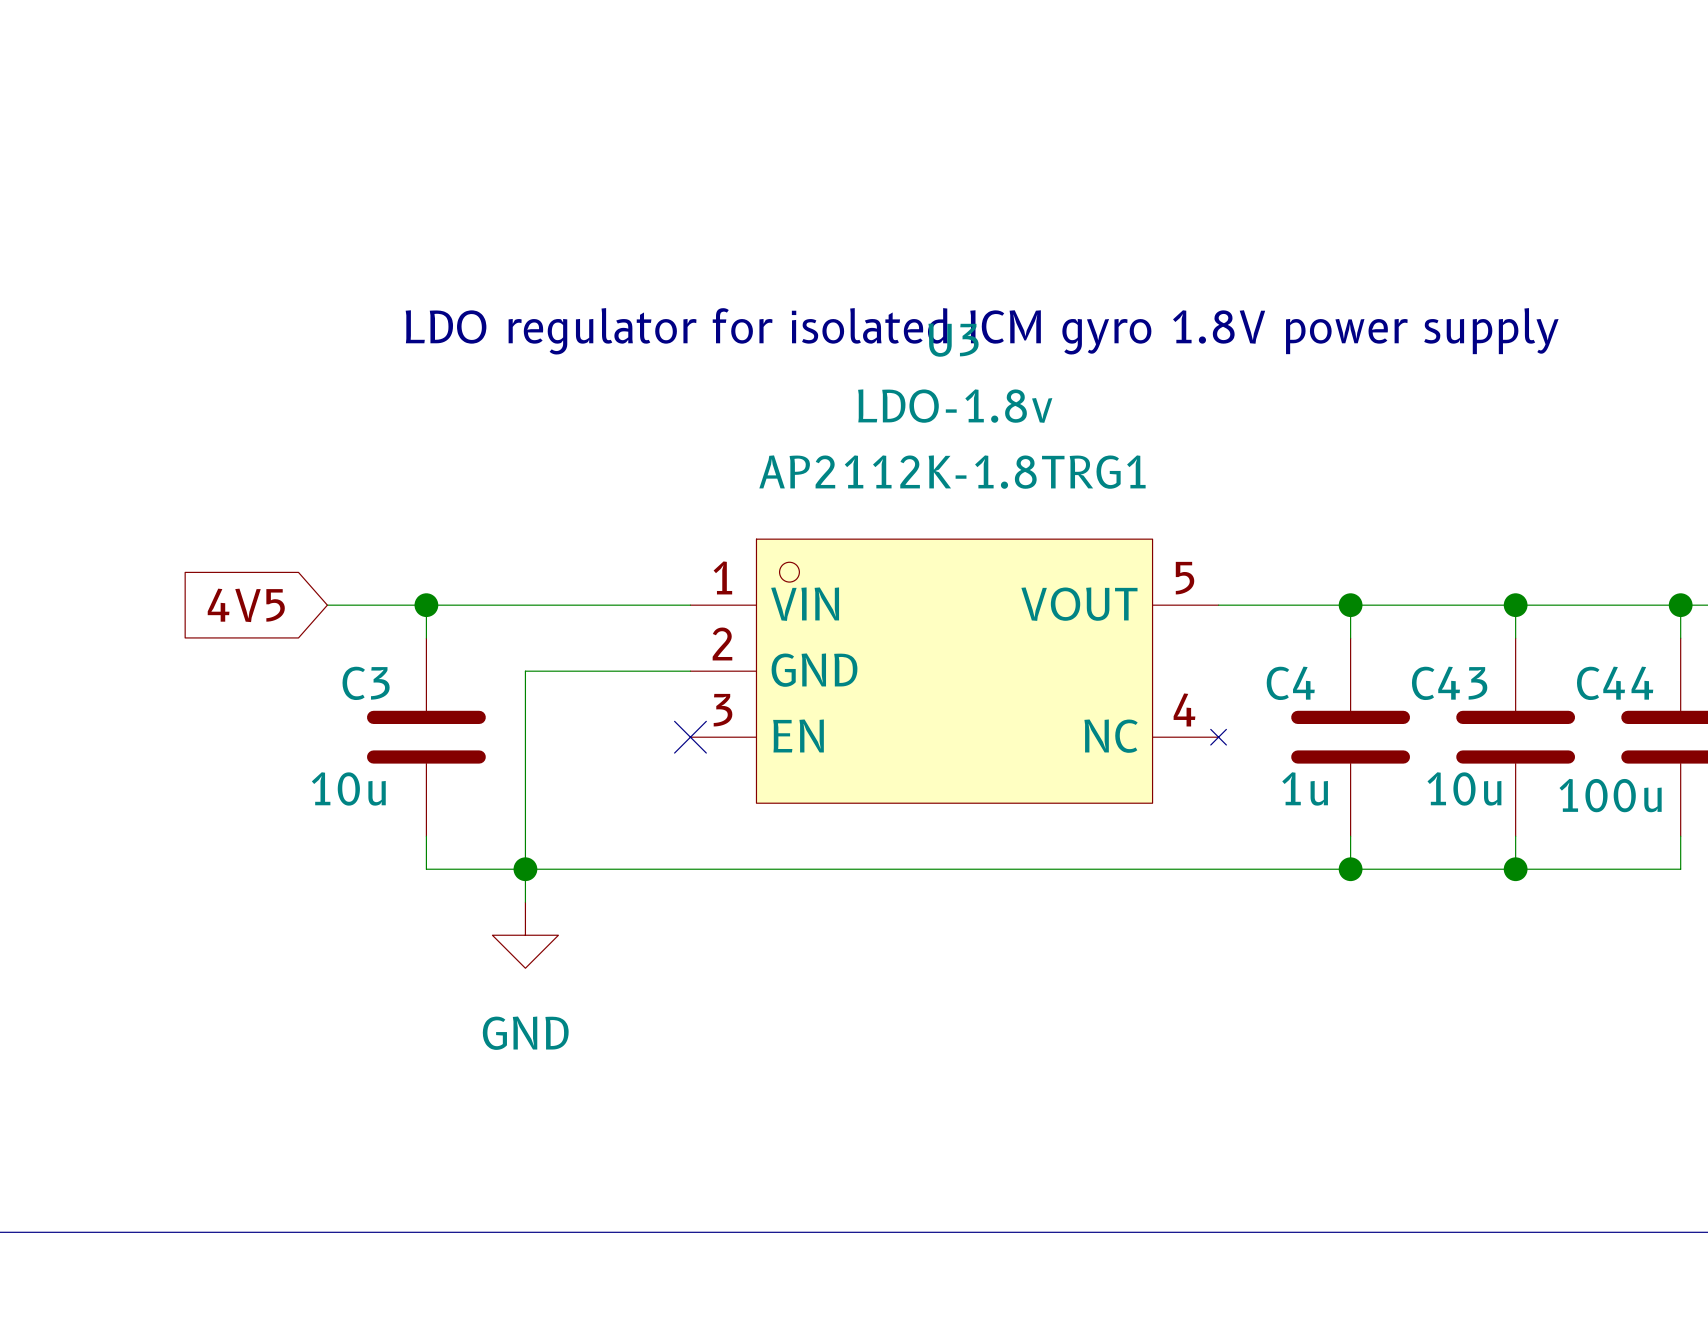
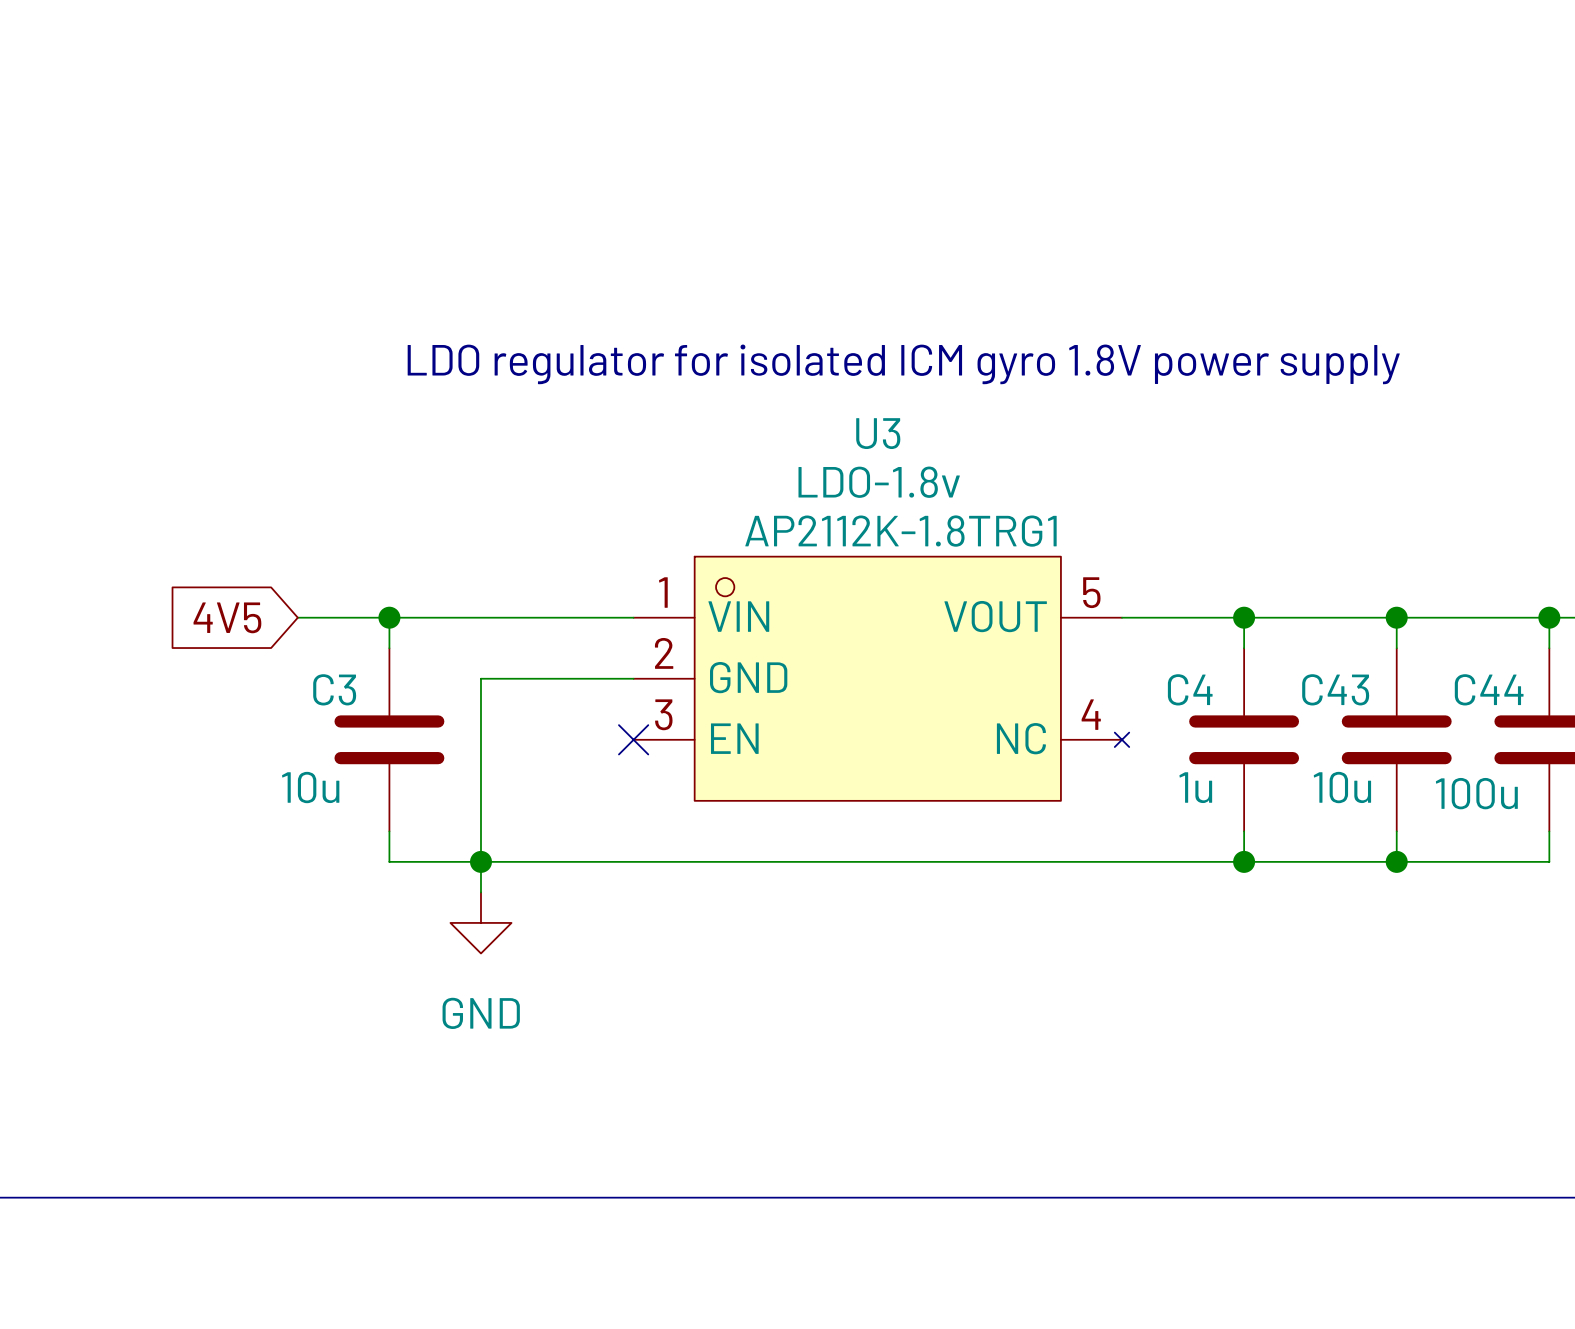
U3 name position: U3 (953, 340) -> U3 (878, 433)
U3 value position: LDO-1.8v (955, 406) -> LDO-1.8v (879, 482)
U3 text position: AP2112K-1.8TRG1 (952, 472) -> AP2112K-1.8TRG1 (900, 531)

